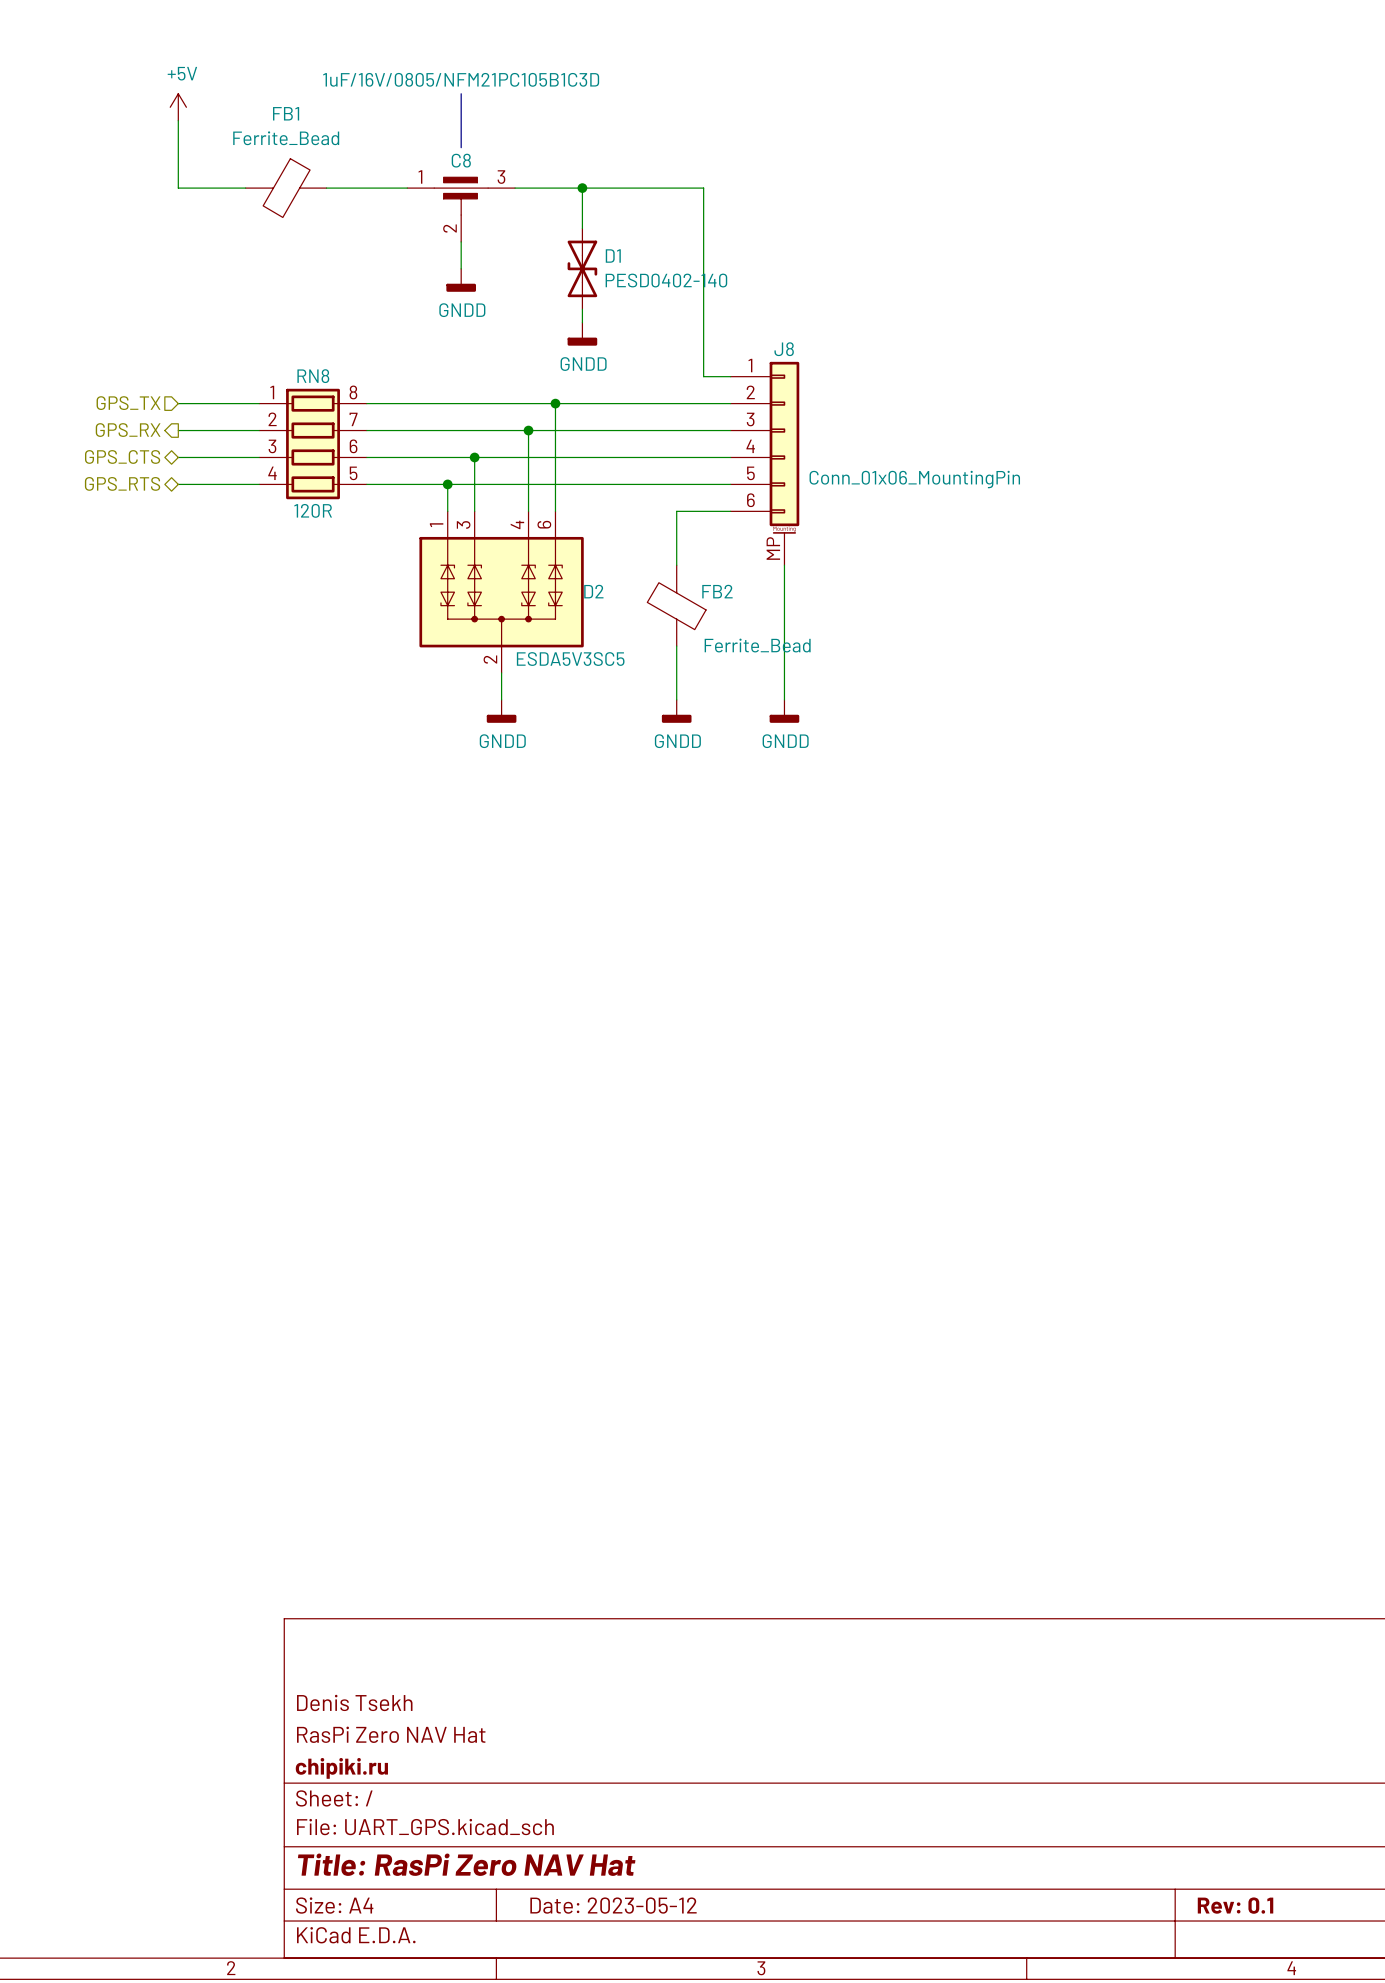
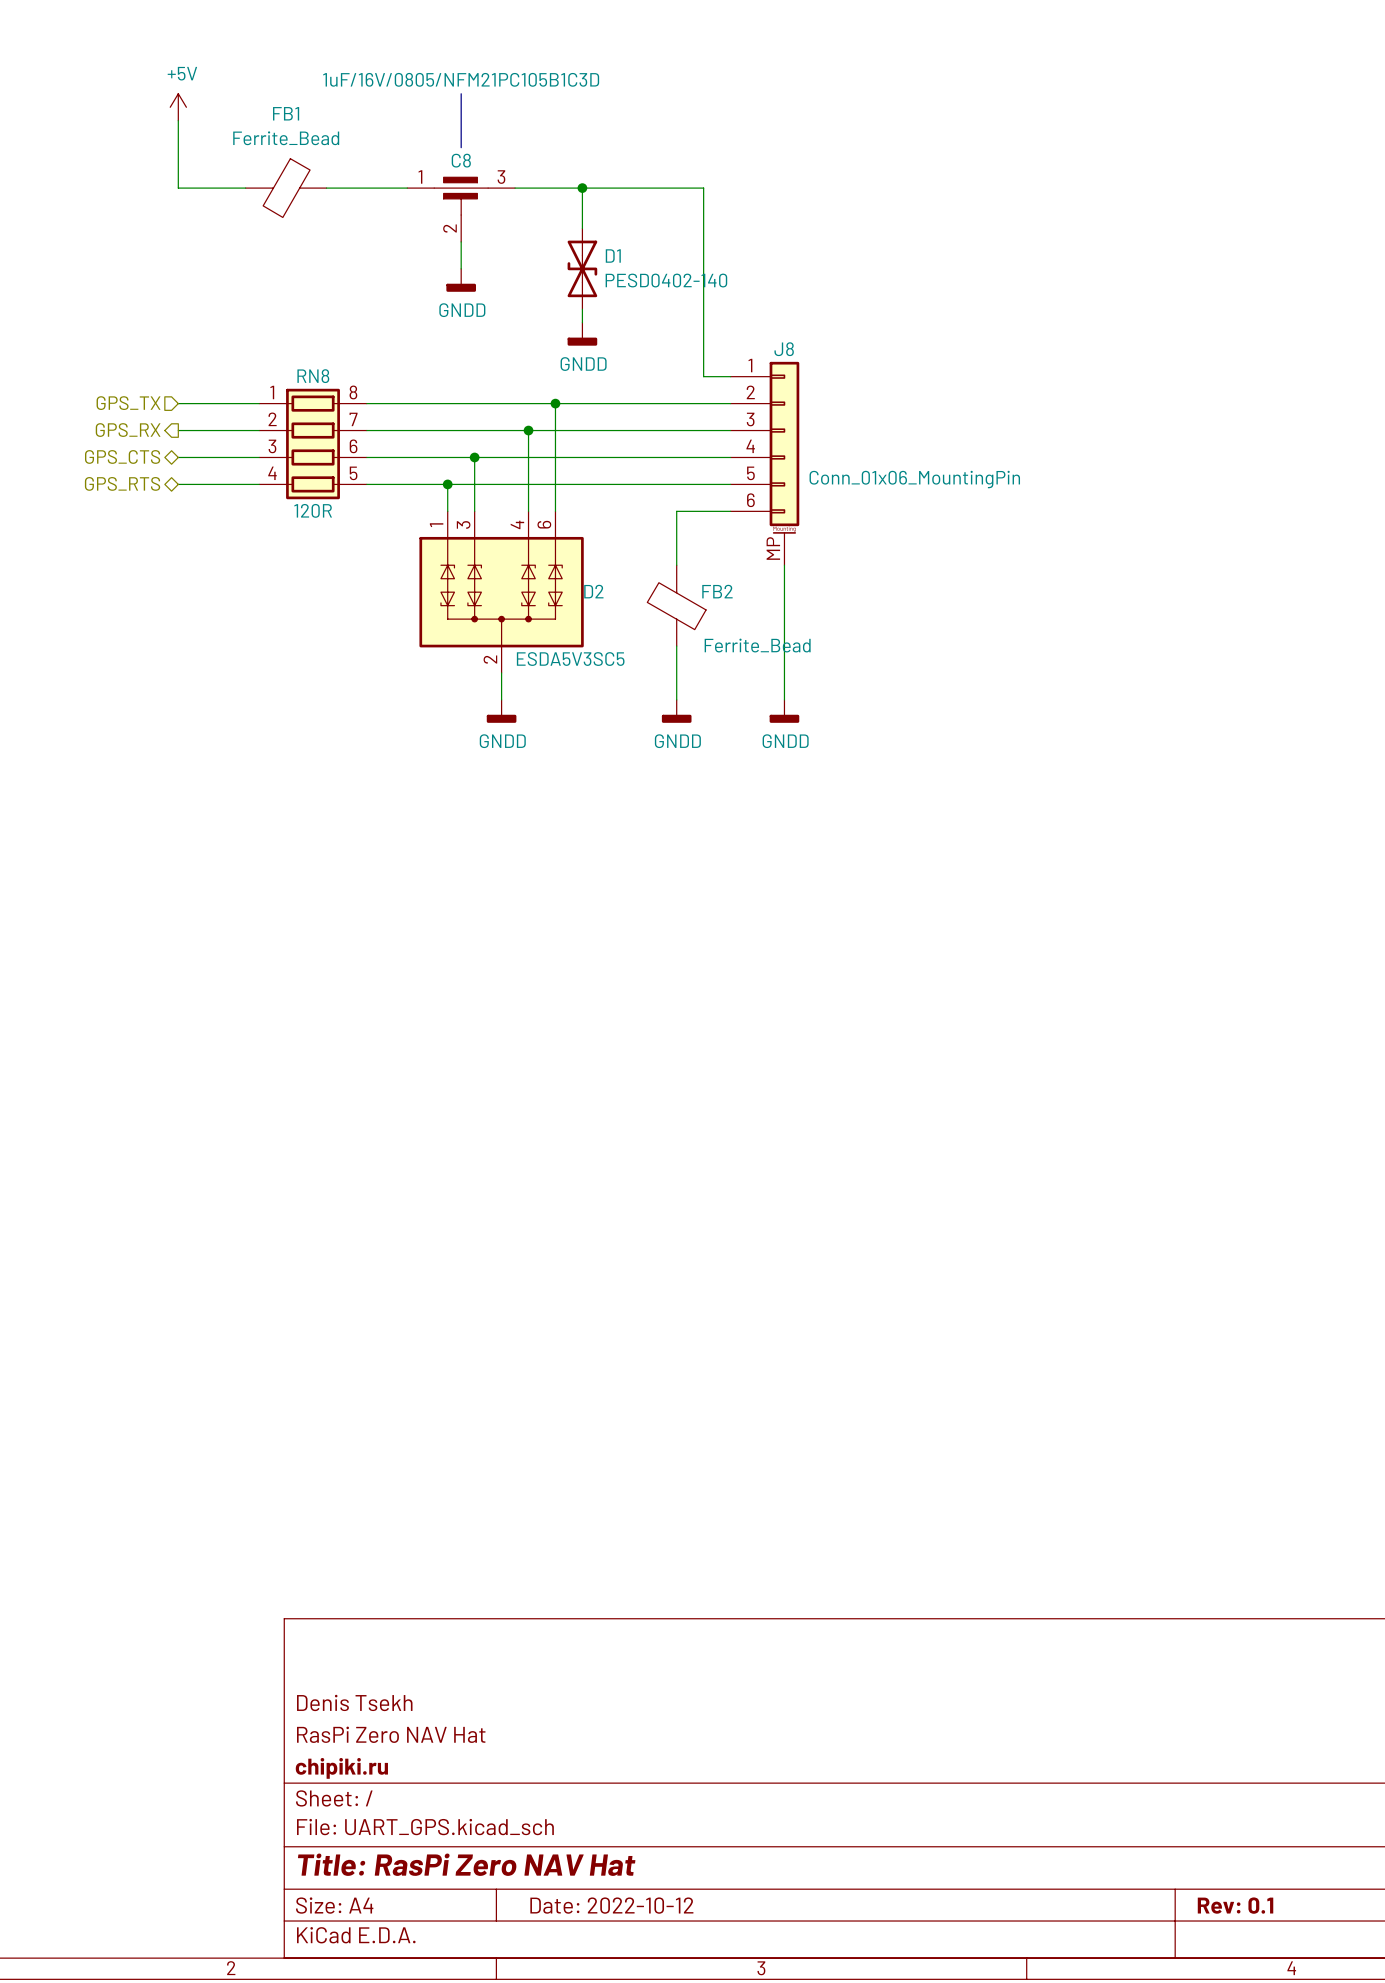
title block: Date: 2023-05-12 (613, 1905) -> Date: 2022-10-12 (611, 1905)

